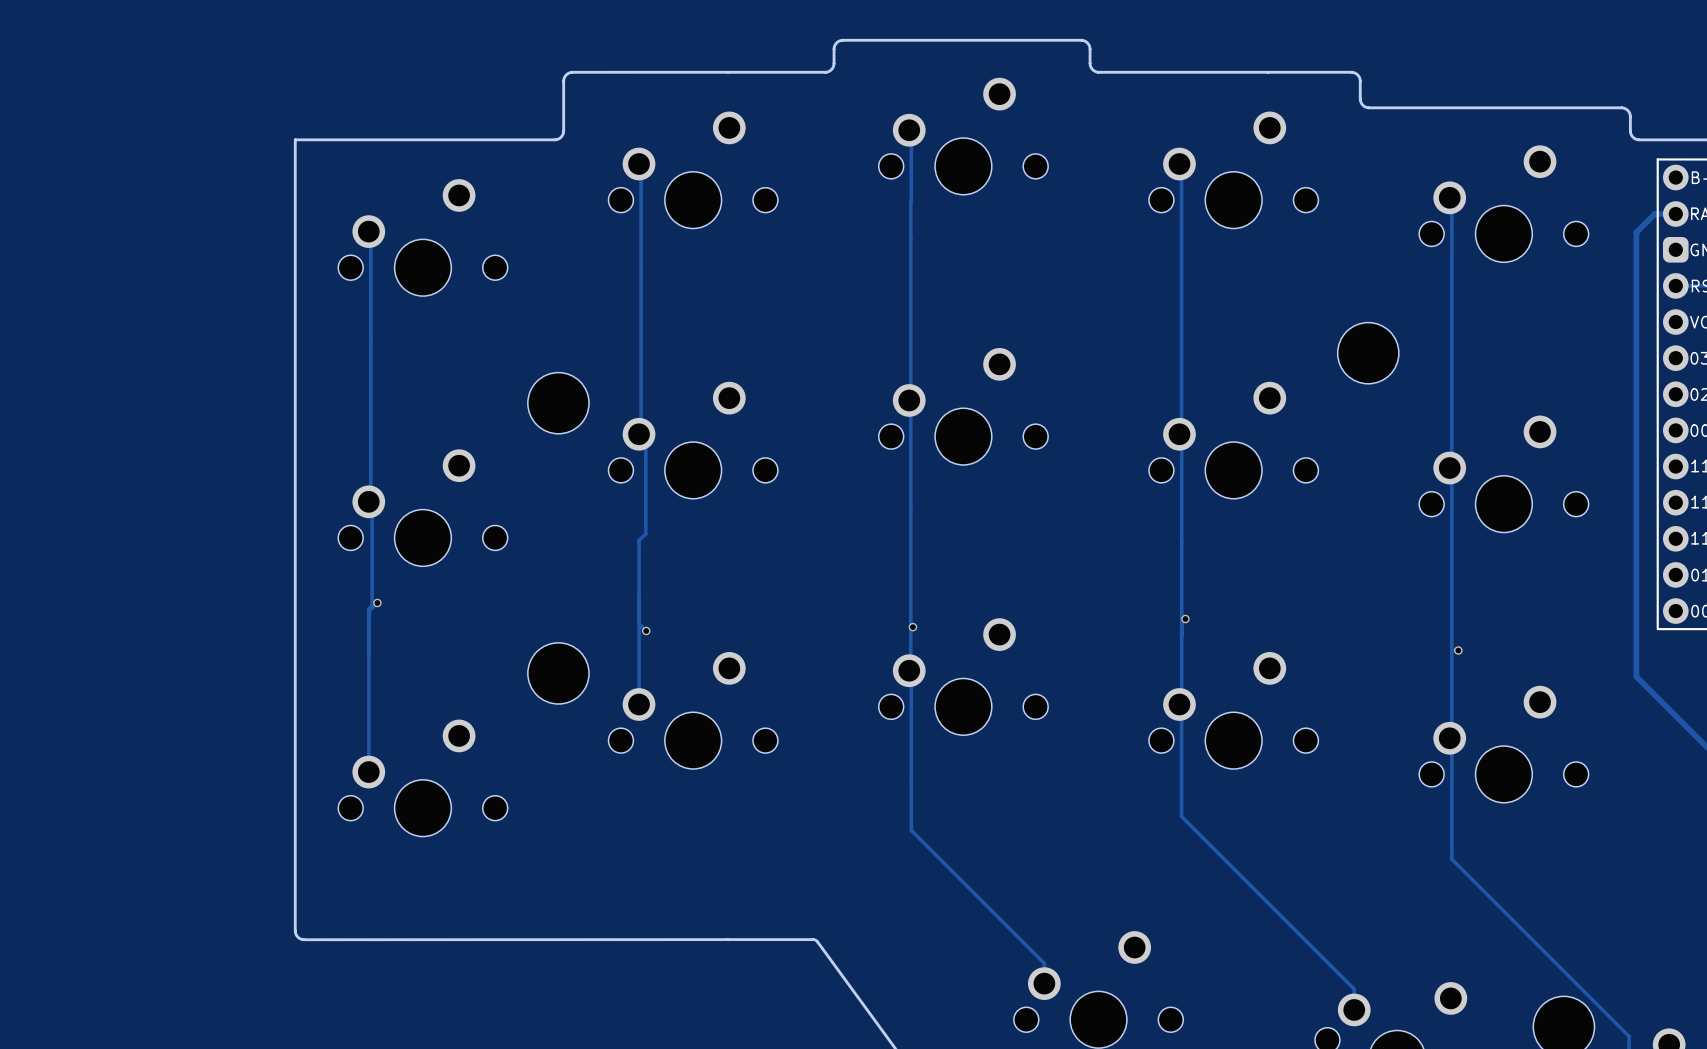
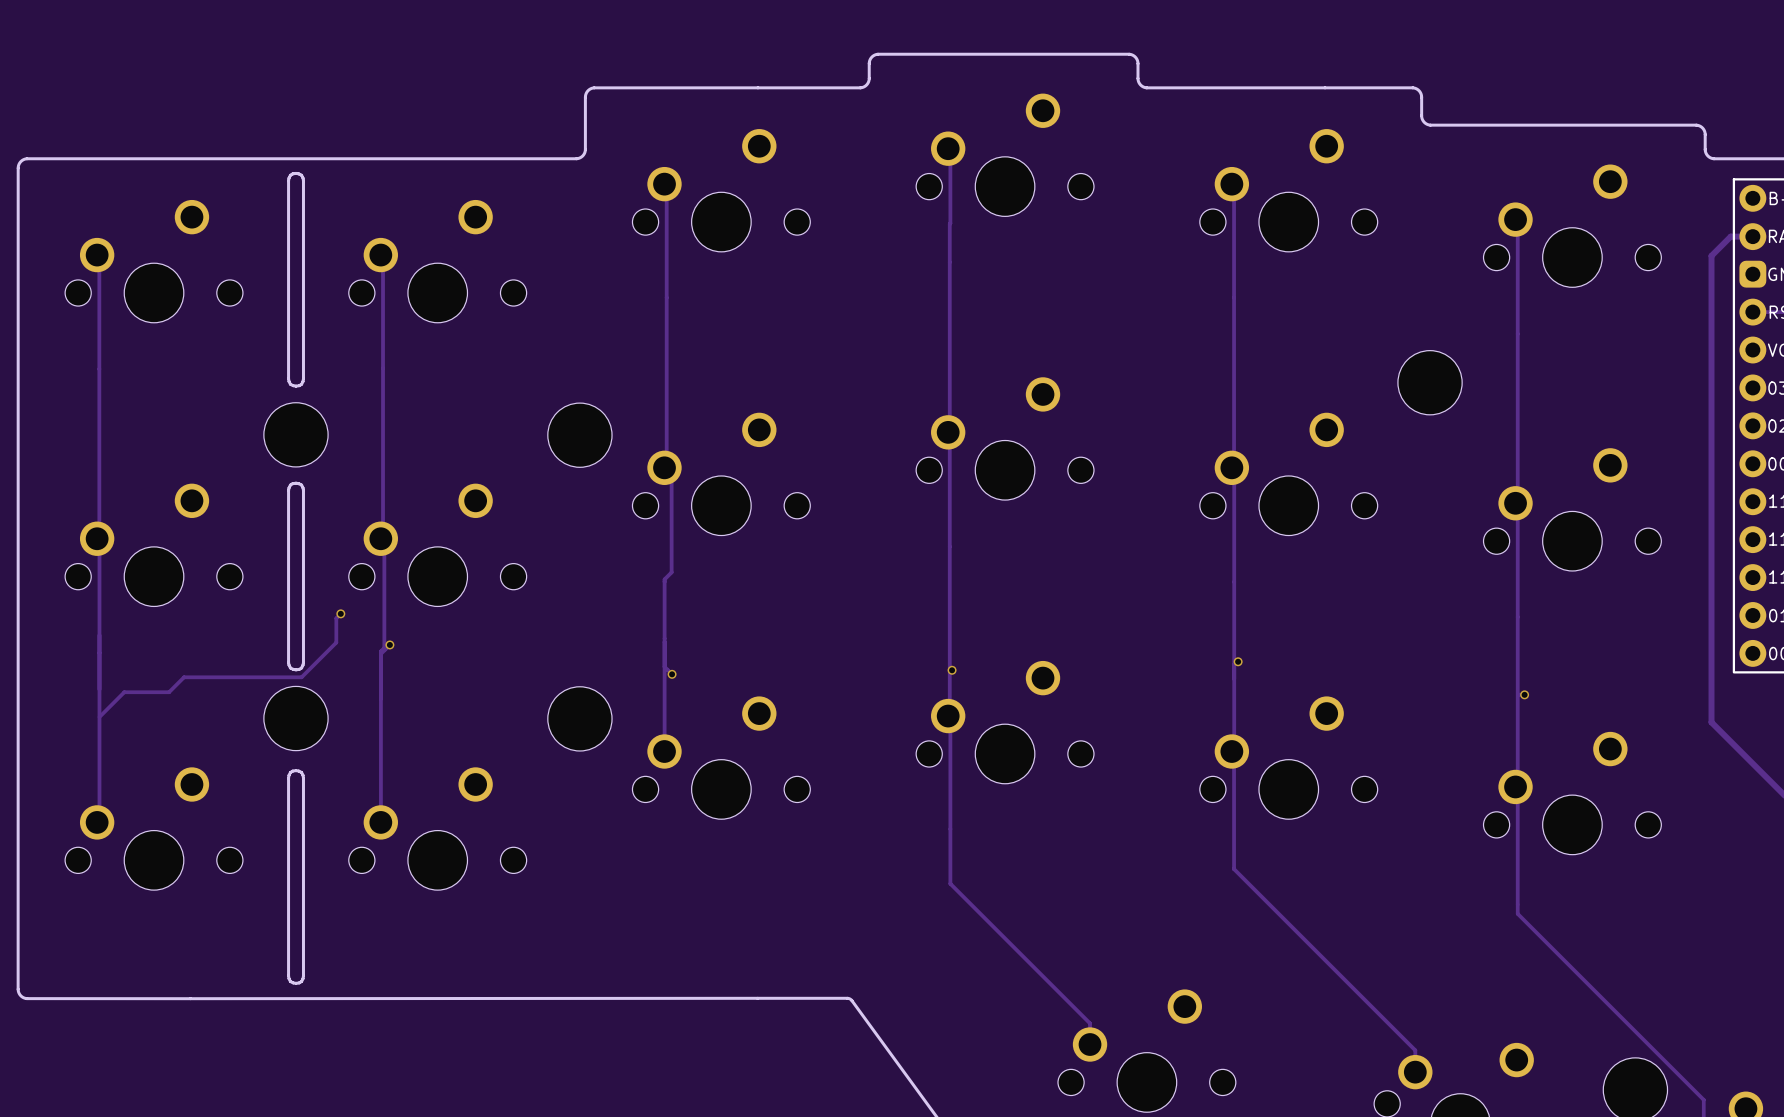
board edge: (295, 139) (296, 935) (303, 939) (727, 939) -> (303, 158) (26, 158) (18, 164) (19, 993) (26, 998) (757, 998)
board edge: none -> (296, 173) (290, 175) (288, 180) (288, 378) (290, 384) (296, 386) (301, 384) (303, 378) (303, 180) (301, 175) (296, 173)
track: none -> (97, 255) (99, 257) (99, 536) (97, 538) (99, 541) (99, 820) (97, 822)
part: none -> (154, 261)
part: none -> (295, 434)
board edge: none -> (296, 483) (301, 485) (303, 490) (303, 662) (301, 667) (296, 669) (290, 667) (288, 662) (288, 490) (290, 485) (296, 483)
part: none -> (154, 545)
track: none -> (340, 613) (336, 618) (336, 642) (301, 677) (184, 677) (169, 692) (124, 692) (99, 717)
via: none -> (340, 613)
part: none -> (295, 718)
board edge: none -> (296, 770) (301, 772) (303, 778) (303, 975) (301, 981) (296, 983) (290, 981) (288, 975) (288, 778) (290, 772) (296, 770)
part: none -> (154, 828)

